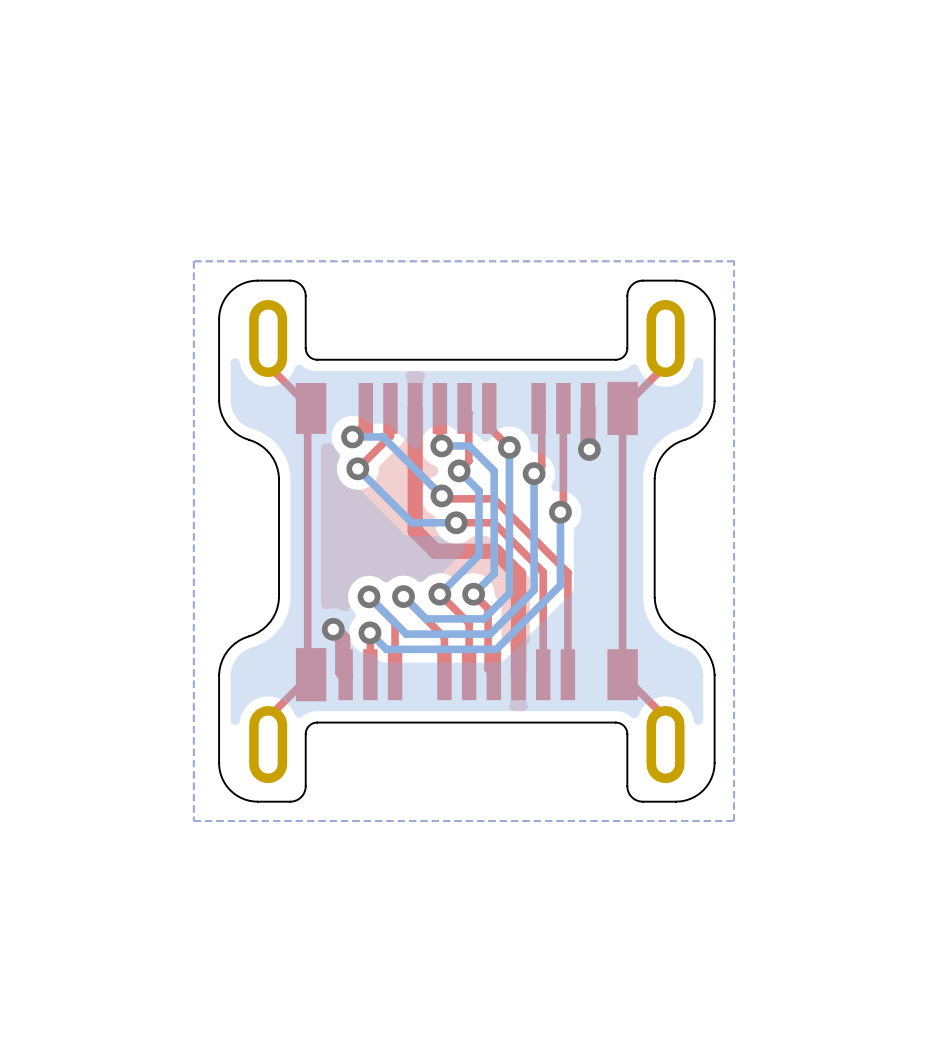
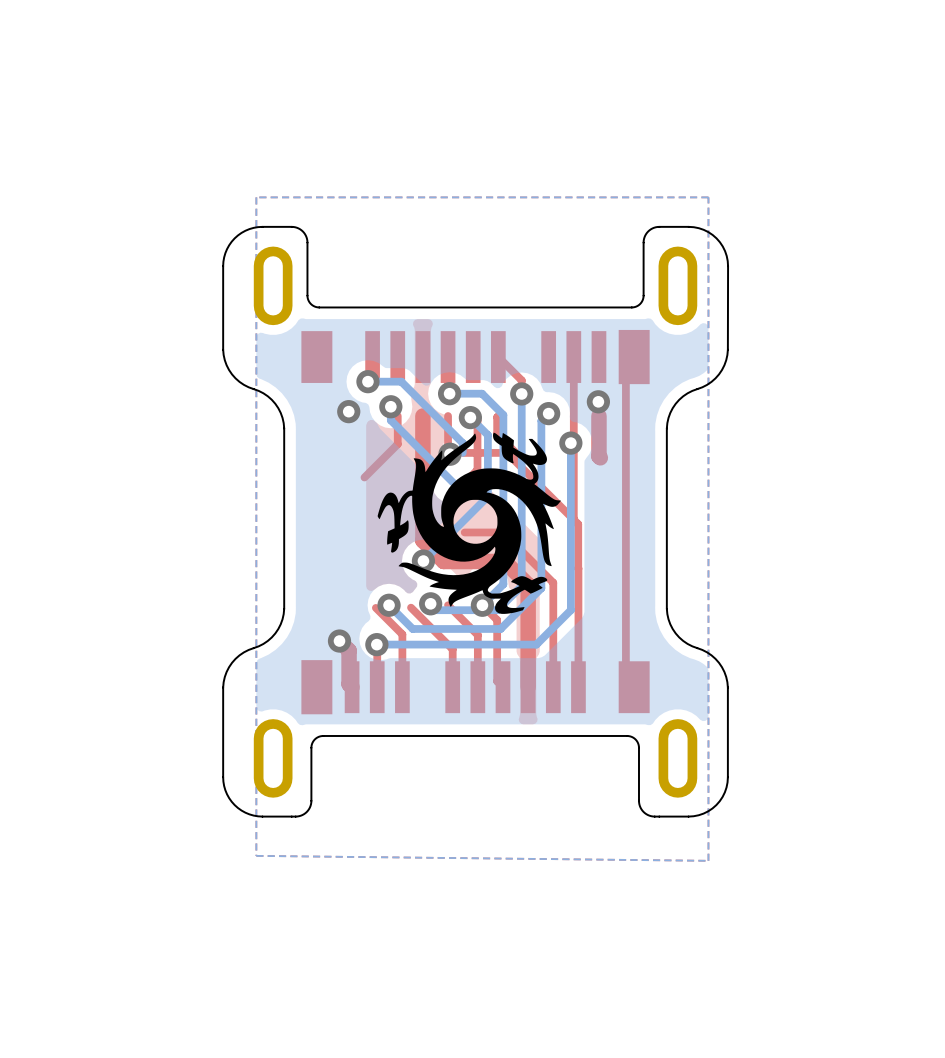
bottom zone outline: (734, 261) (734, 820) (193, 820) (193, 261) (734, 261) -> (708, 197) (708, 860) (256, 855) (256, 197) (708, 197)
board edge: (714, 319) (708, 298) (692, 284) (676, 280) (637, 281) (630, 286) (627, 294) (626, 351) (622, 357) (615, 359) (314, 359) (308, 355) (305, 349) (305, 292) (301, 285) (292, 280) (253, 280) (240, 284) (225, 298) (219, 319) -> (728, 325) (728, 266) (725, 251) (719, 242) (708, 232) (688, 226) (655, 227) (646, 234) (643, 242) (643, 297) (640, 304) (631, 307) (316, 307) (310, 304) (307, 297) (307, 242) (304, 232) (293, 226) (253, 227) (237, 235) (225, 253) (223, 266) (223, 325)
top track: (268, 338) (268, 365) (311, 408) (307, 411) (307, 671) (311, 674) (268, 717) (268, 744) -> none
top track: (665, 338) (665, 365) (622, 408) (622, 674) (665, 717) (665, 744) -> none
board edge: (219, 343) (219, 401) (222, 416) (235, 432) (258, 444) (266, 450) (275, 463) (279, 478) -> (223, 349) (226, 365) (235, 378) (243, 384) (267, 396) (280, 412) (284, 428) (284, 487)
board edge: (714, 343) (714, 401) (711, 416) (698, 432) (675, 444) (666, 450) (658, 463) (654, 478) -> (727, 349) (724, 365) (715, 378) (707, 384) (683, 396) (670, 412) (666, 428) (666, 487)
top track: none -> (498, 357) (521, 380) (521, 393)
top track: none -> (573, 357) (573, 416)
top track: none -> (634, 357) (625, 365) (625, 678) (634, 687)
part position: (466, 367) -> (475, 315)
bottom track: none -> (367, 381) (401, 381) (462, 443) (462, 452)
via: none -> (367, 381)
via: none -> (449, 393)
bottom track: none -> (521, 393) (521, 586) (497, 610) (437, 610) (430, 603)
via: none -> (521, 393)
via: none -> (598, 401)
bottom track: none -> (390, 406) (390, 420) (452, 482)
via: none -> (390, 406)
via: none -> (348, 411)
bottom track: none -> (548, 413) (541, 420) (541, 588) (500, 628) (412, 628) (389, 605)
via: none -> (548, 413)
top track: (538, 408) (541, 411) (541, 465) (534, 473) -> none
bottom track: none -> (470, 417) (487, 435) (487, 496) (423, 561)
via: none -> (470, 417)
drawing: none -> [377, 432, 561, 614]
bottom track: none -> (570, 443) (570, 521)
via: none -> (570, 443)
bottom track: (352, 436) (382, 436) (441, 495) -> none
via: (352, 436) -> none
top track: none -> (462, 452) (506, 452) (578, 524) (578, 568)
bottom track: (441, 445) (469, 445) (494, 471) -> (449, 393) (482, 393) (503, 415) (503, 479)
bottom track: (509, 447) (509, 593) (483, 618) (425, 618) (403, 596) -> none
via: (509, 447) -> none
via: (589, 449) -> none
bottom track: (357, 468) (411, 522) (456, 522) -> none
via: (357, 468) -> none
bottom track: (459, 470) (479, 490) (479, 555) (439, 594) -> none
via: (459, 470) -> none
bottom track: (534, 473) (534, 590) (490, 634) (406, 634) (369, 596) -> none
via: (534, 473) -> none
top track: (441, 495) (444, 498) (494, 498) (567, 572) -> (578, 568) (578, 583)
via: (441, 495) -> none
via: (560, 512) -> none
via: (456, 522) -> none
via: none -> (423, 561)
bottom track: (560, 585) (496, 649) (386, 649) (369, 632) -> (570, 596) (570, 610) (536, 644) (386, 644) (380, 638)
via: none -> (430, 603)
via: none -> (389, 605)
via: (439, 594) -> none
via: (369, 596) -> none
via: (403, 596) -> none

